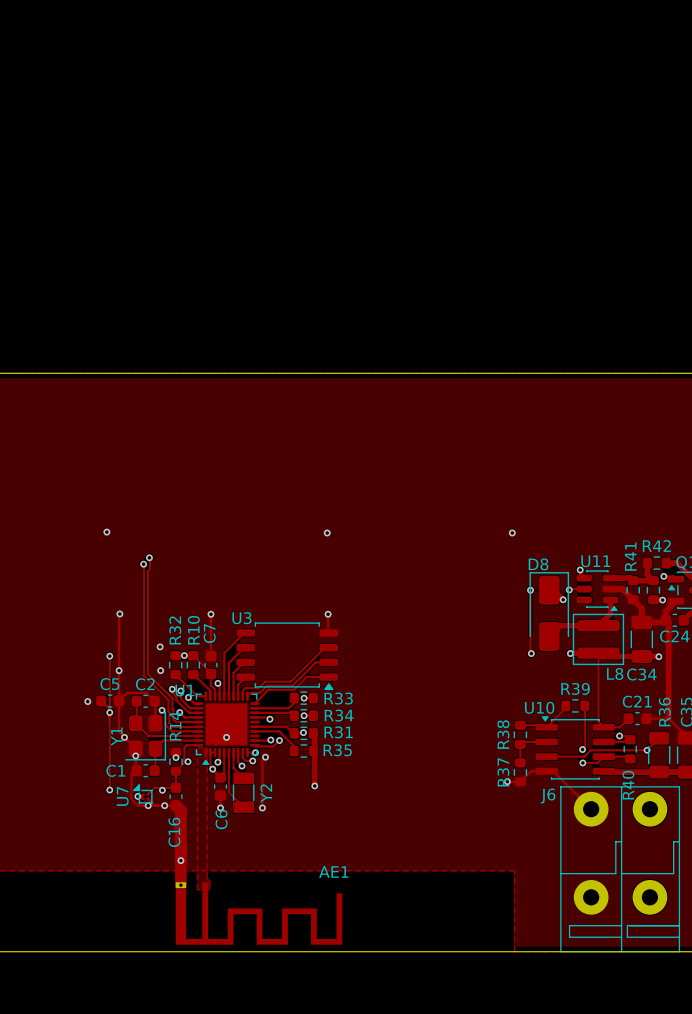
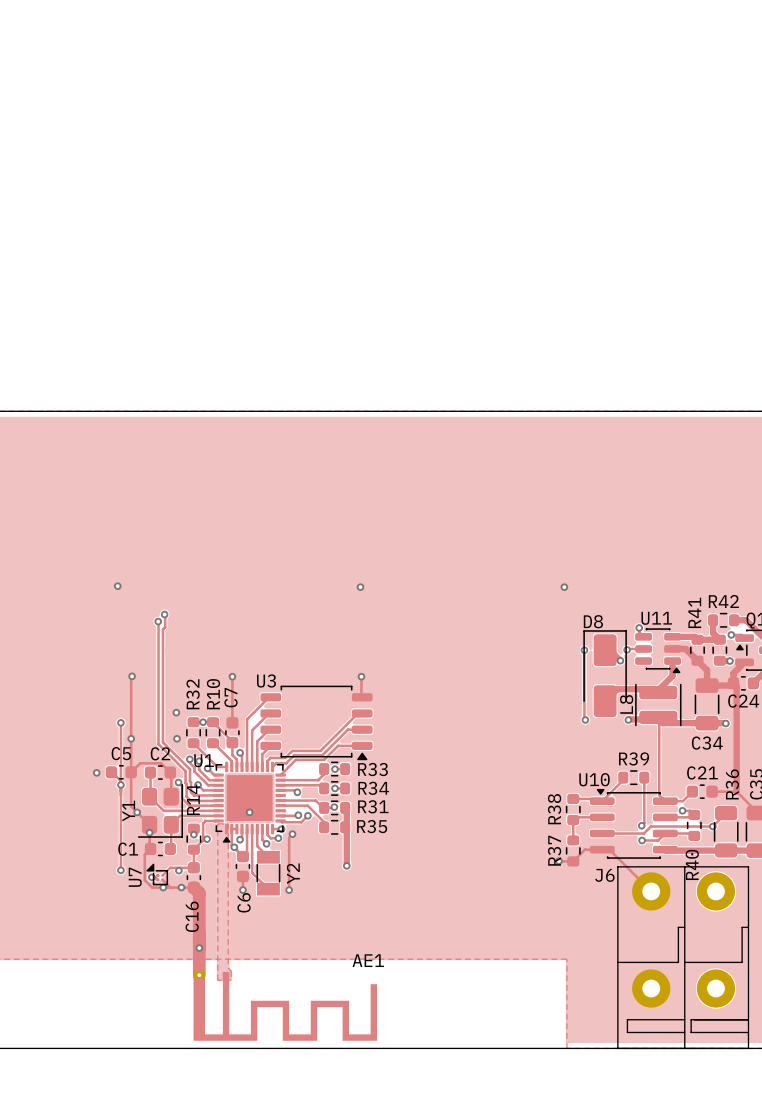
L8 footprint: [572, 613, 625, 666] -> [635, 683, 682, 727]
L8 name position: L8 (615, 673) -> L8 (626, 704)

